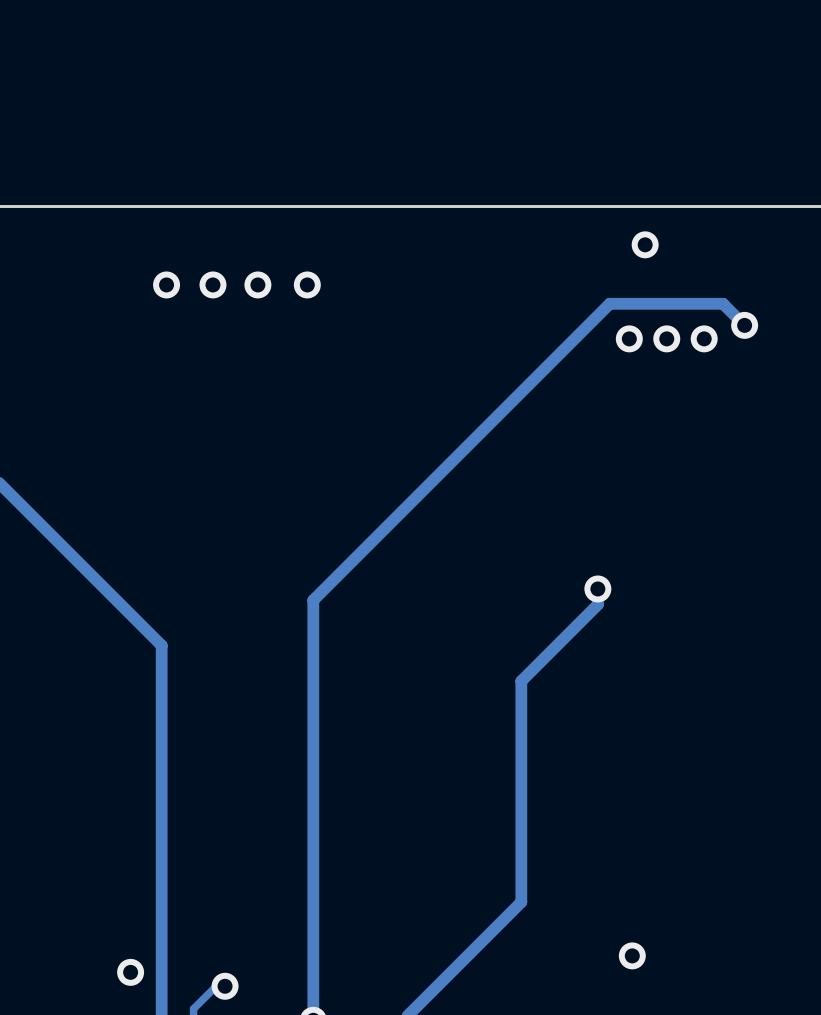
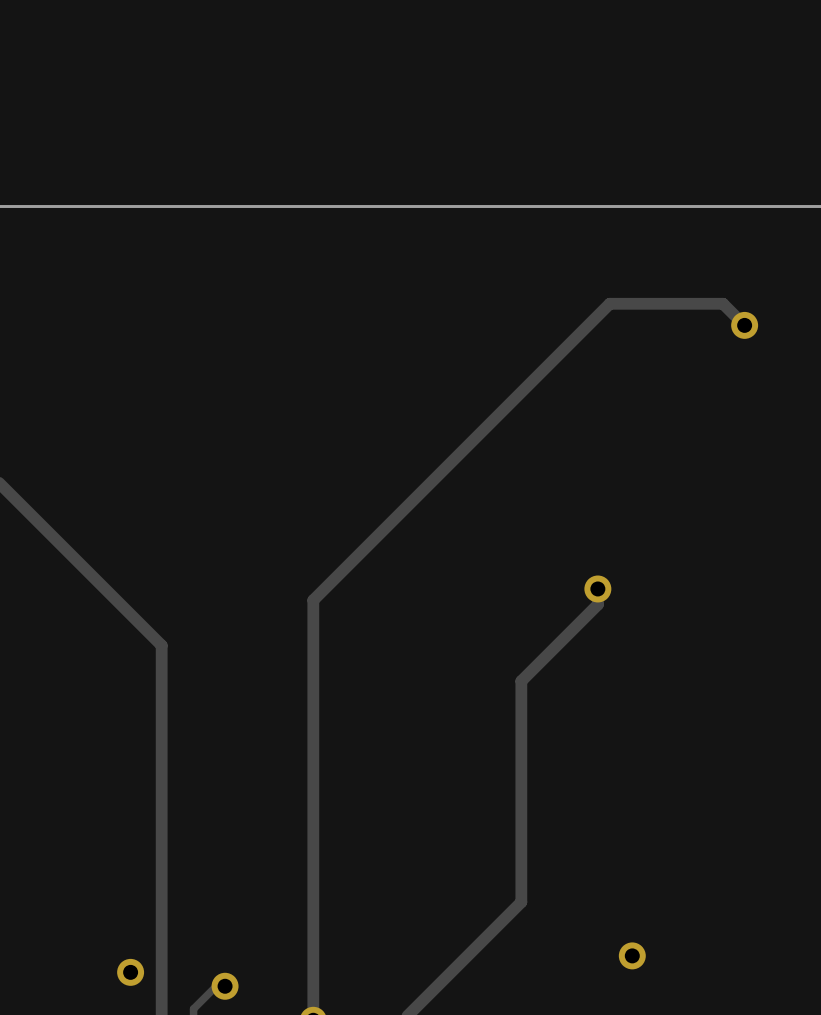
via: (645, 244) -> none
via: (166, 284) -> none
via: (212, 284) -> none
via: (257, 284) -> none
via: (307, 284) -> none
via: (629, 338) -> none
via: (666, 338) -> none
via: (704, 338) -> none

